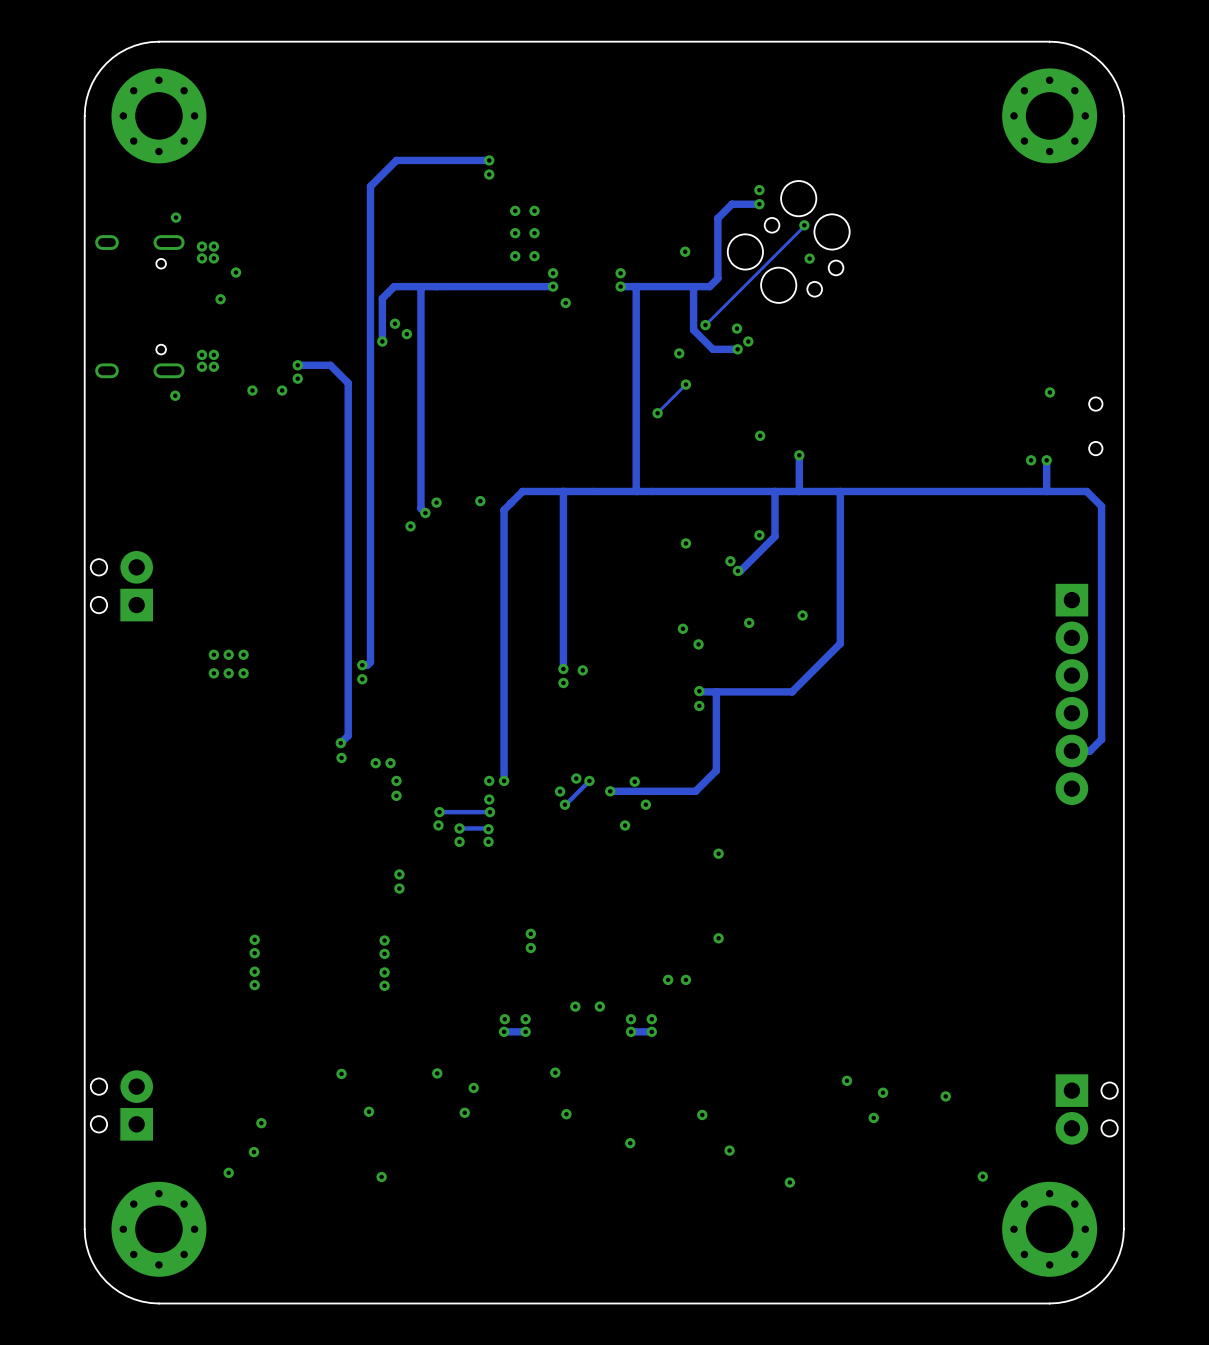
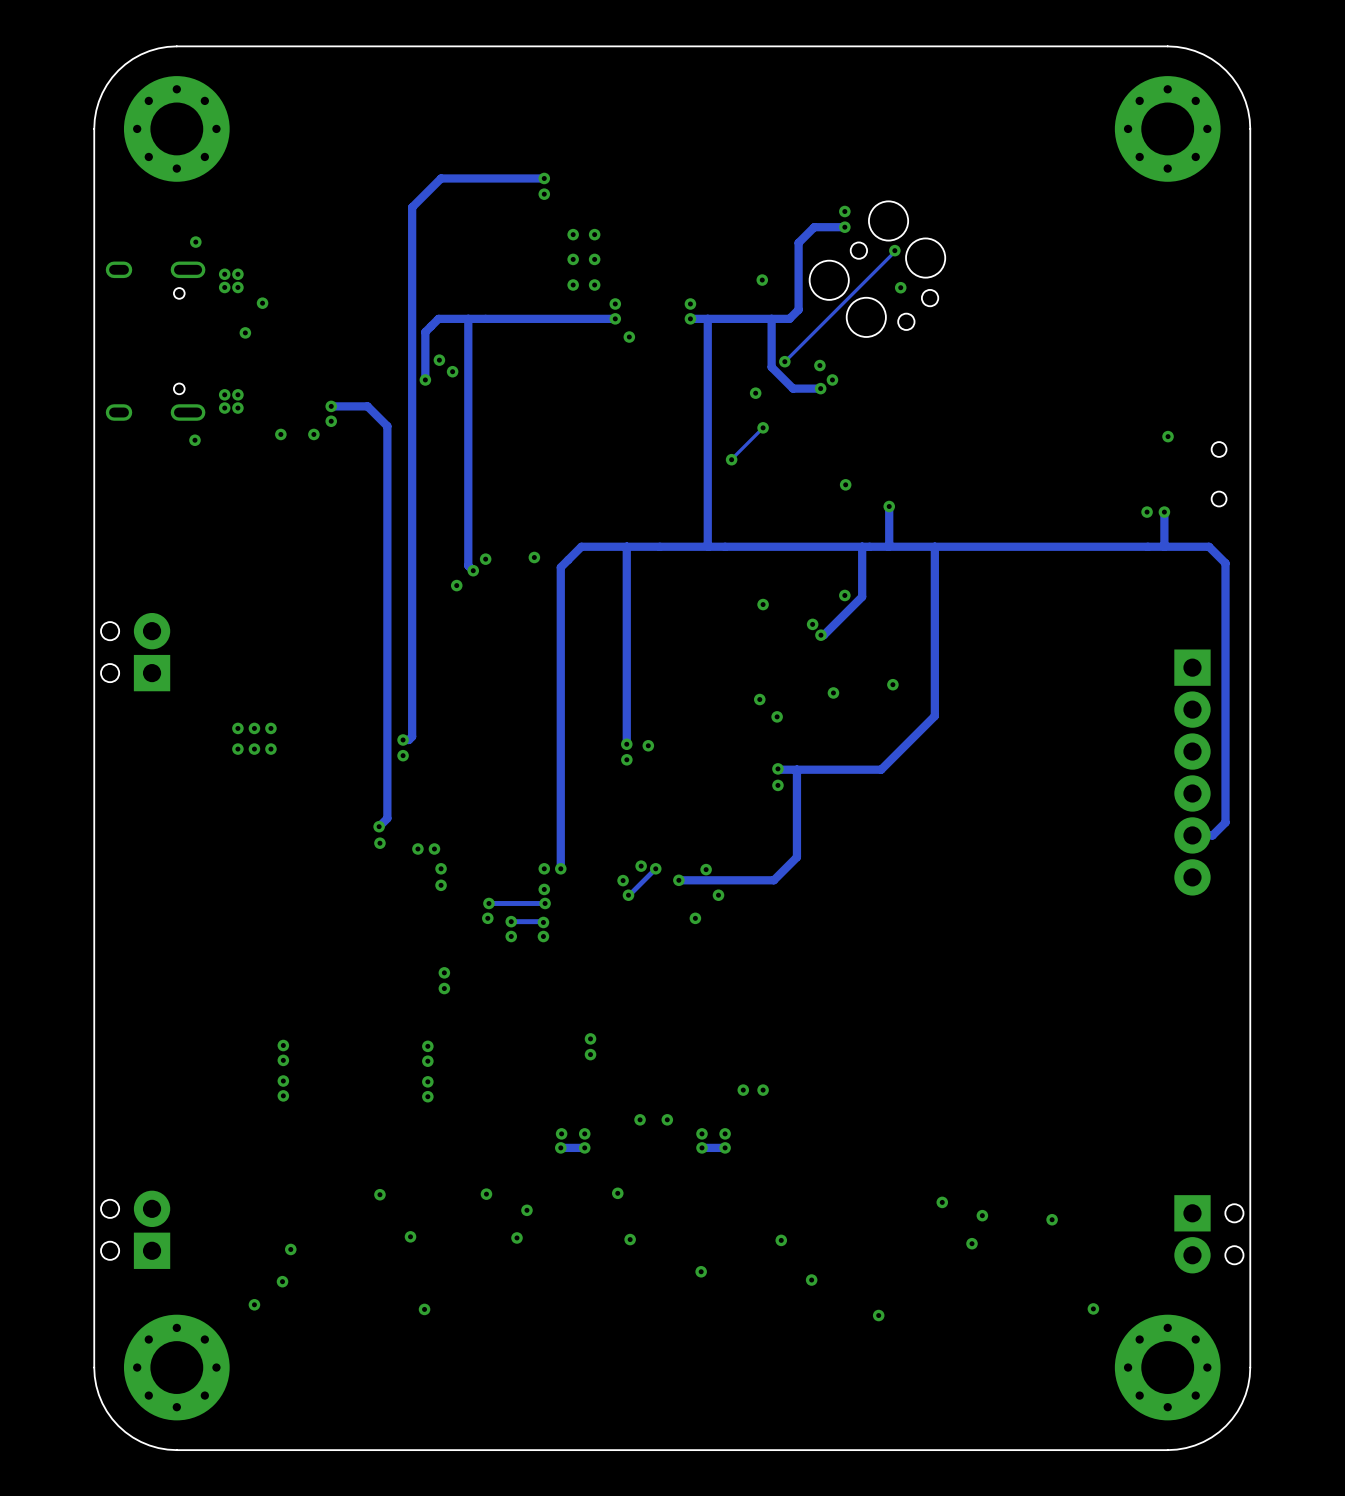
via: (718, 853) -> none
via: (718, 938) -> none

